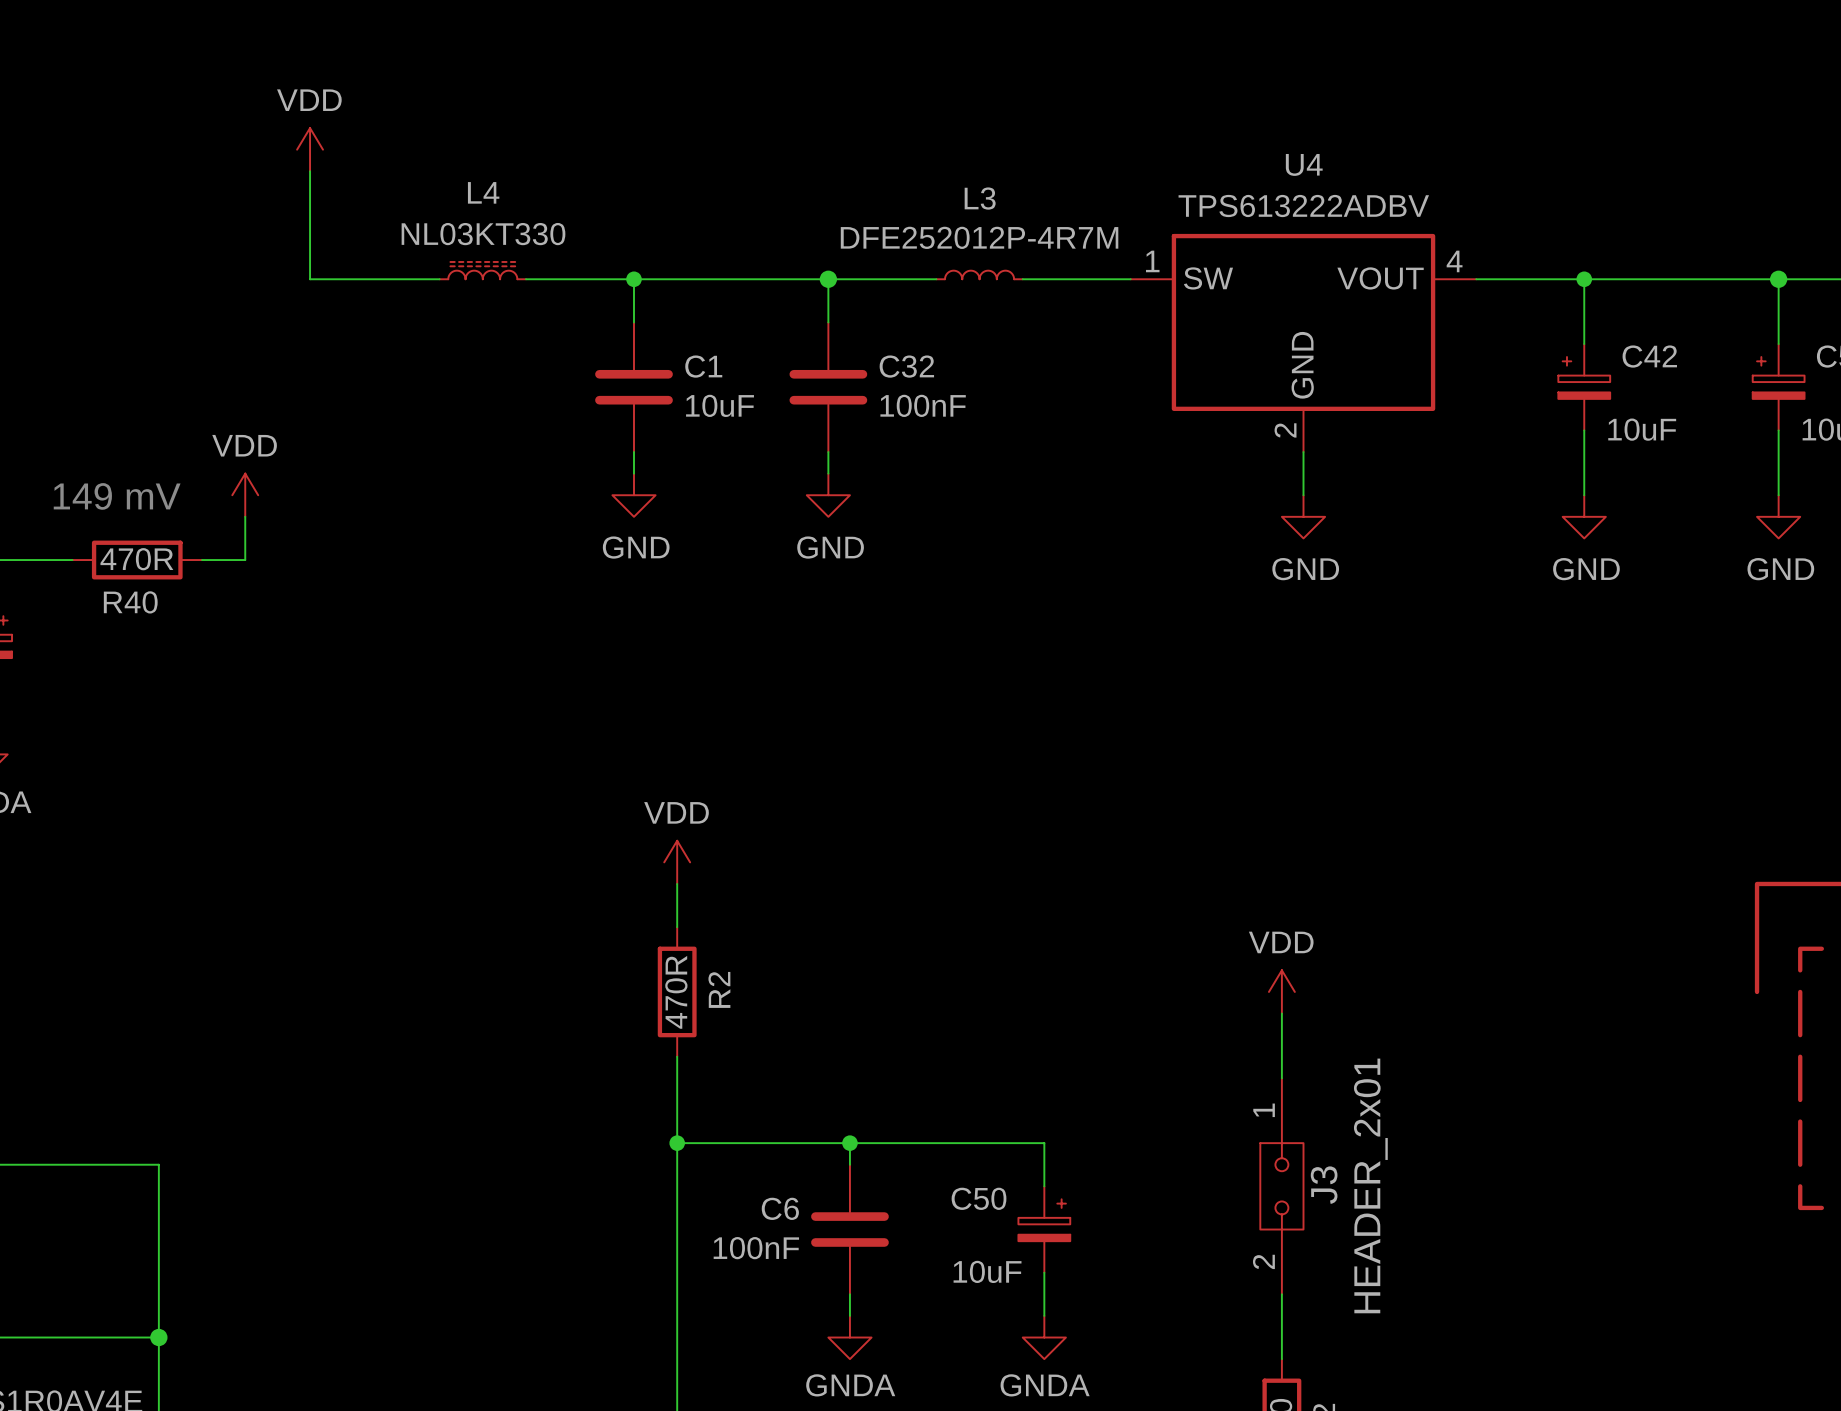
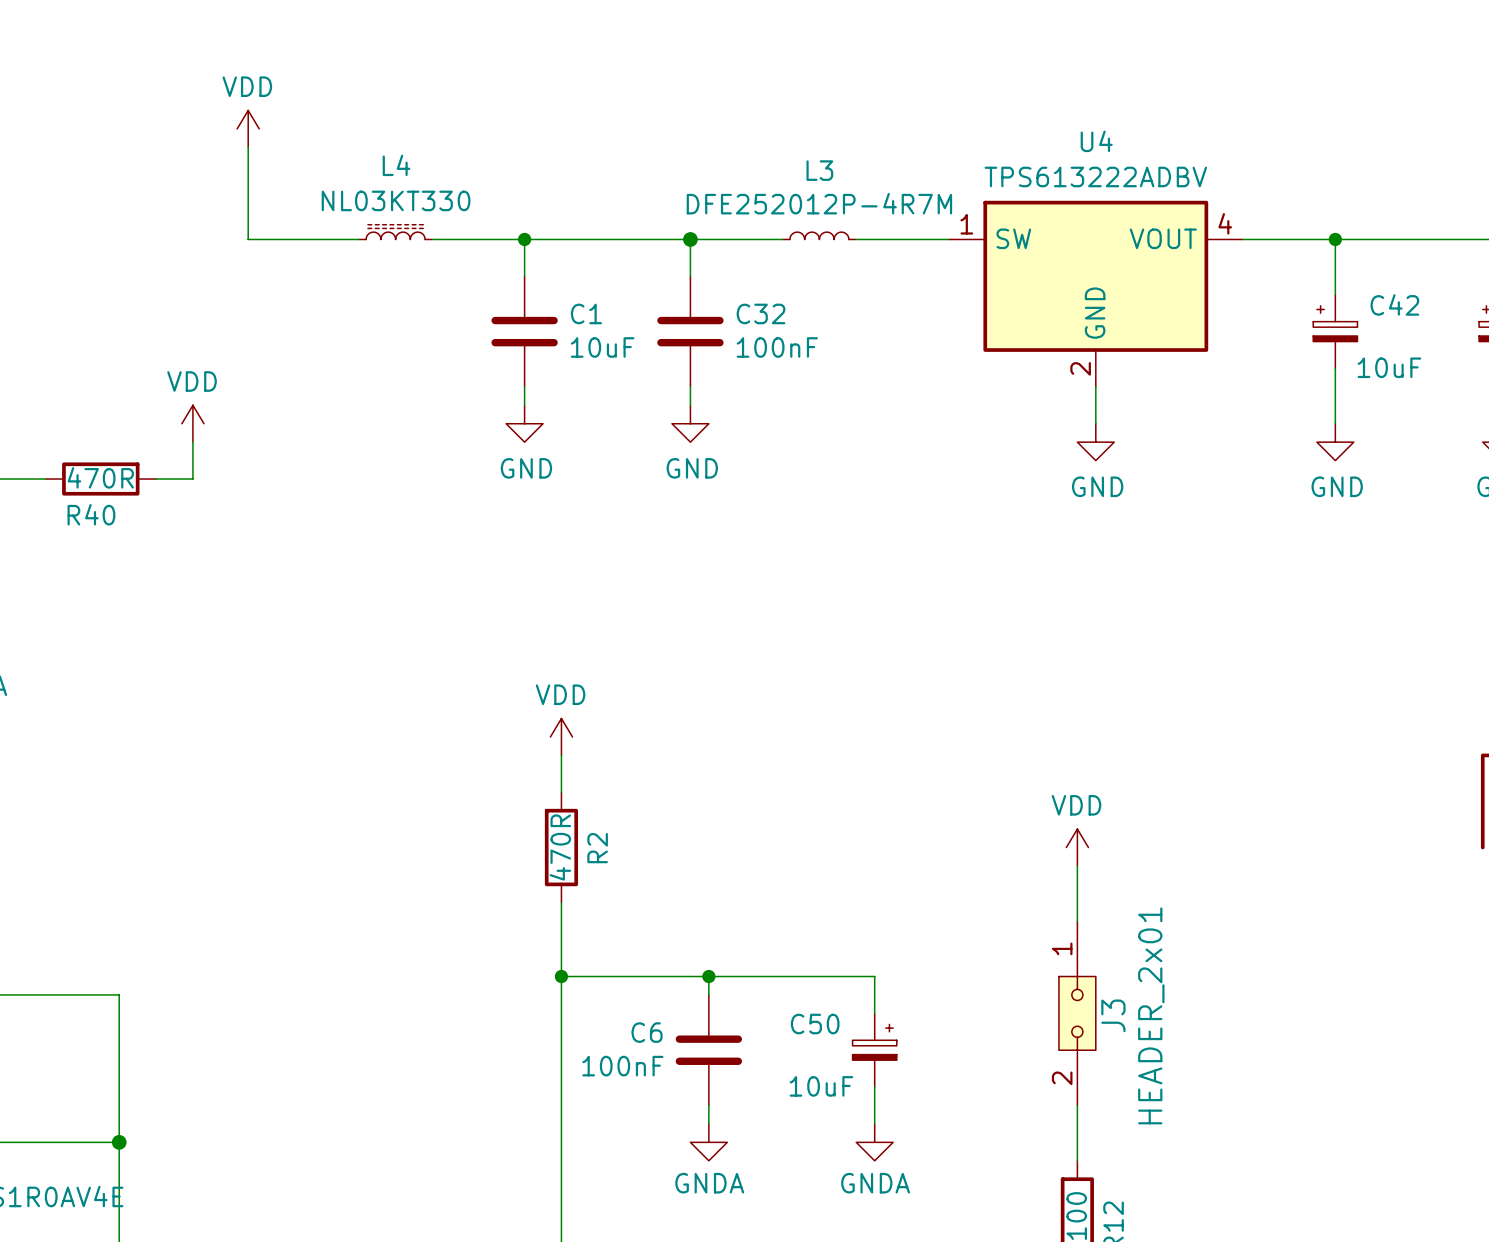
text: 149 mV (117, 496) -> none

